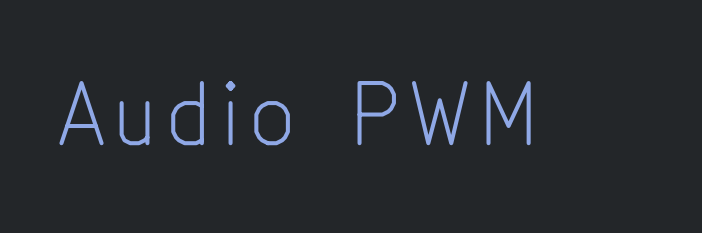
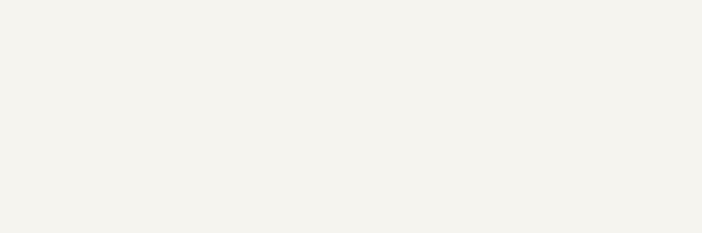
text: Audio PWM (295, 113) -> none

